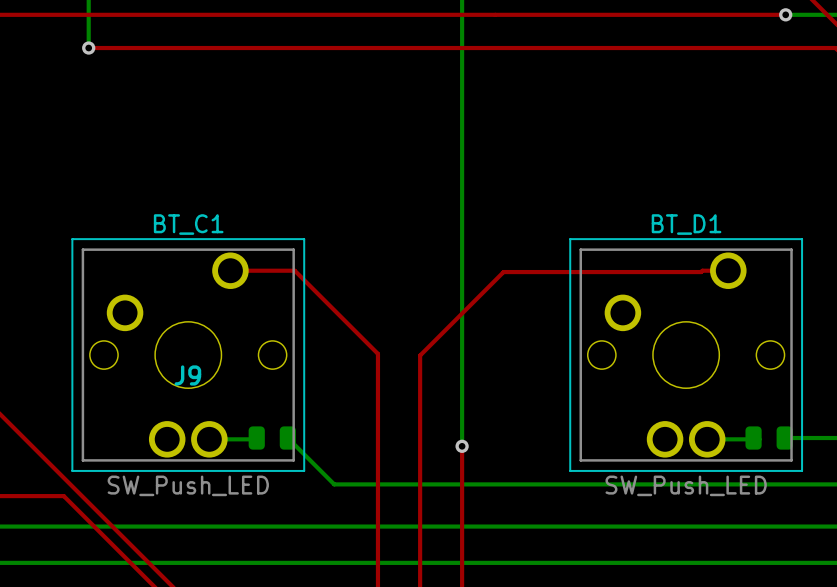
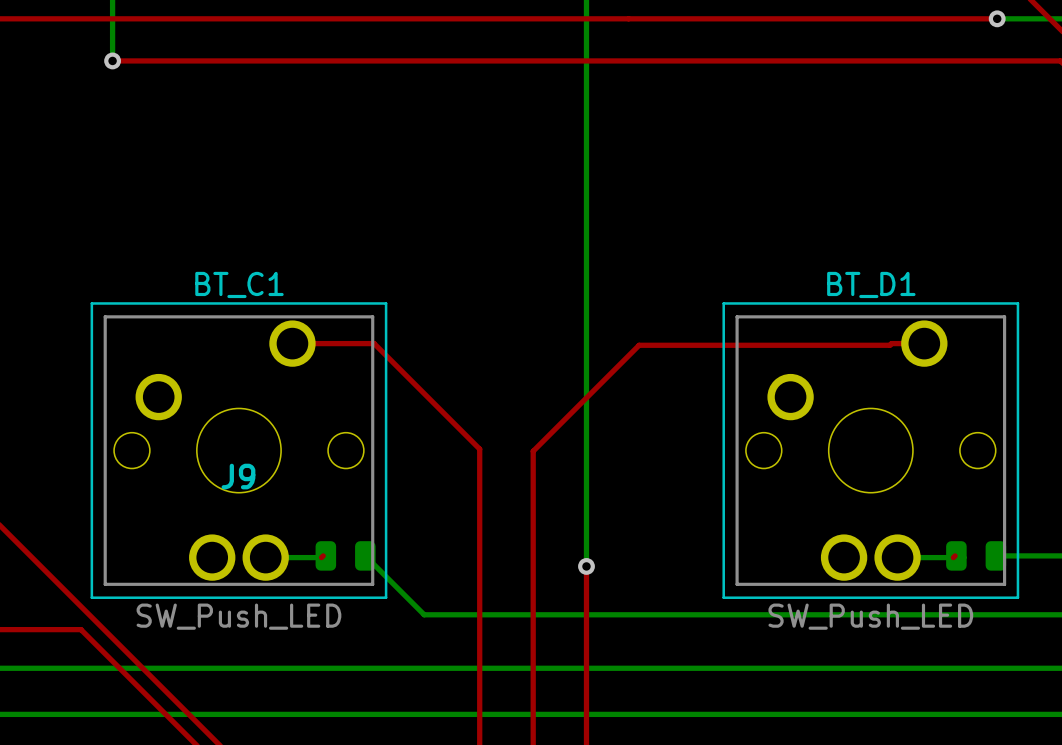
top track: none -> (323, 555) (321, 557)
top track: none -> (955, 555) (953, 557)

